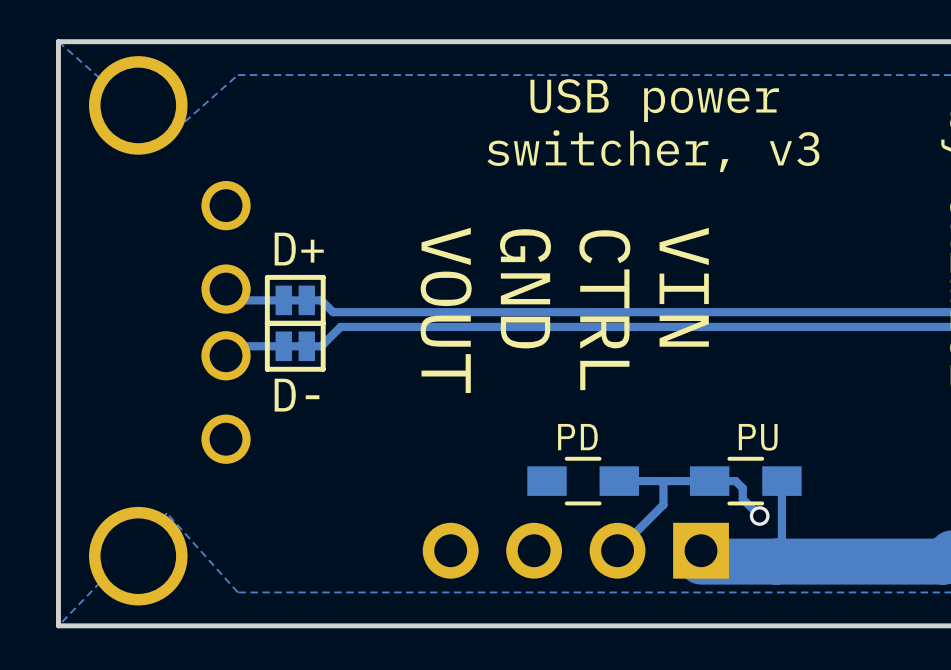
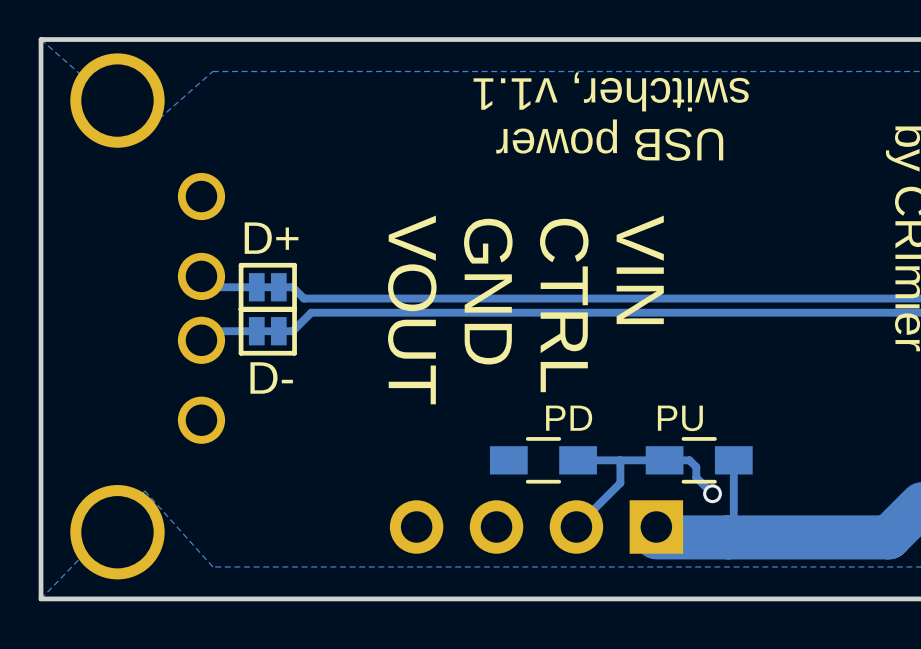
text: USB power (654, 100) -> switcher, v1.1 (611, 91)
text: switcher, v3 (653, 151) -> USB power (609, 140)

